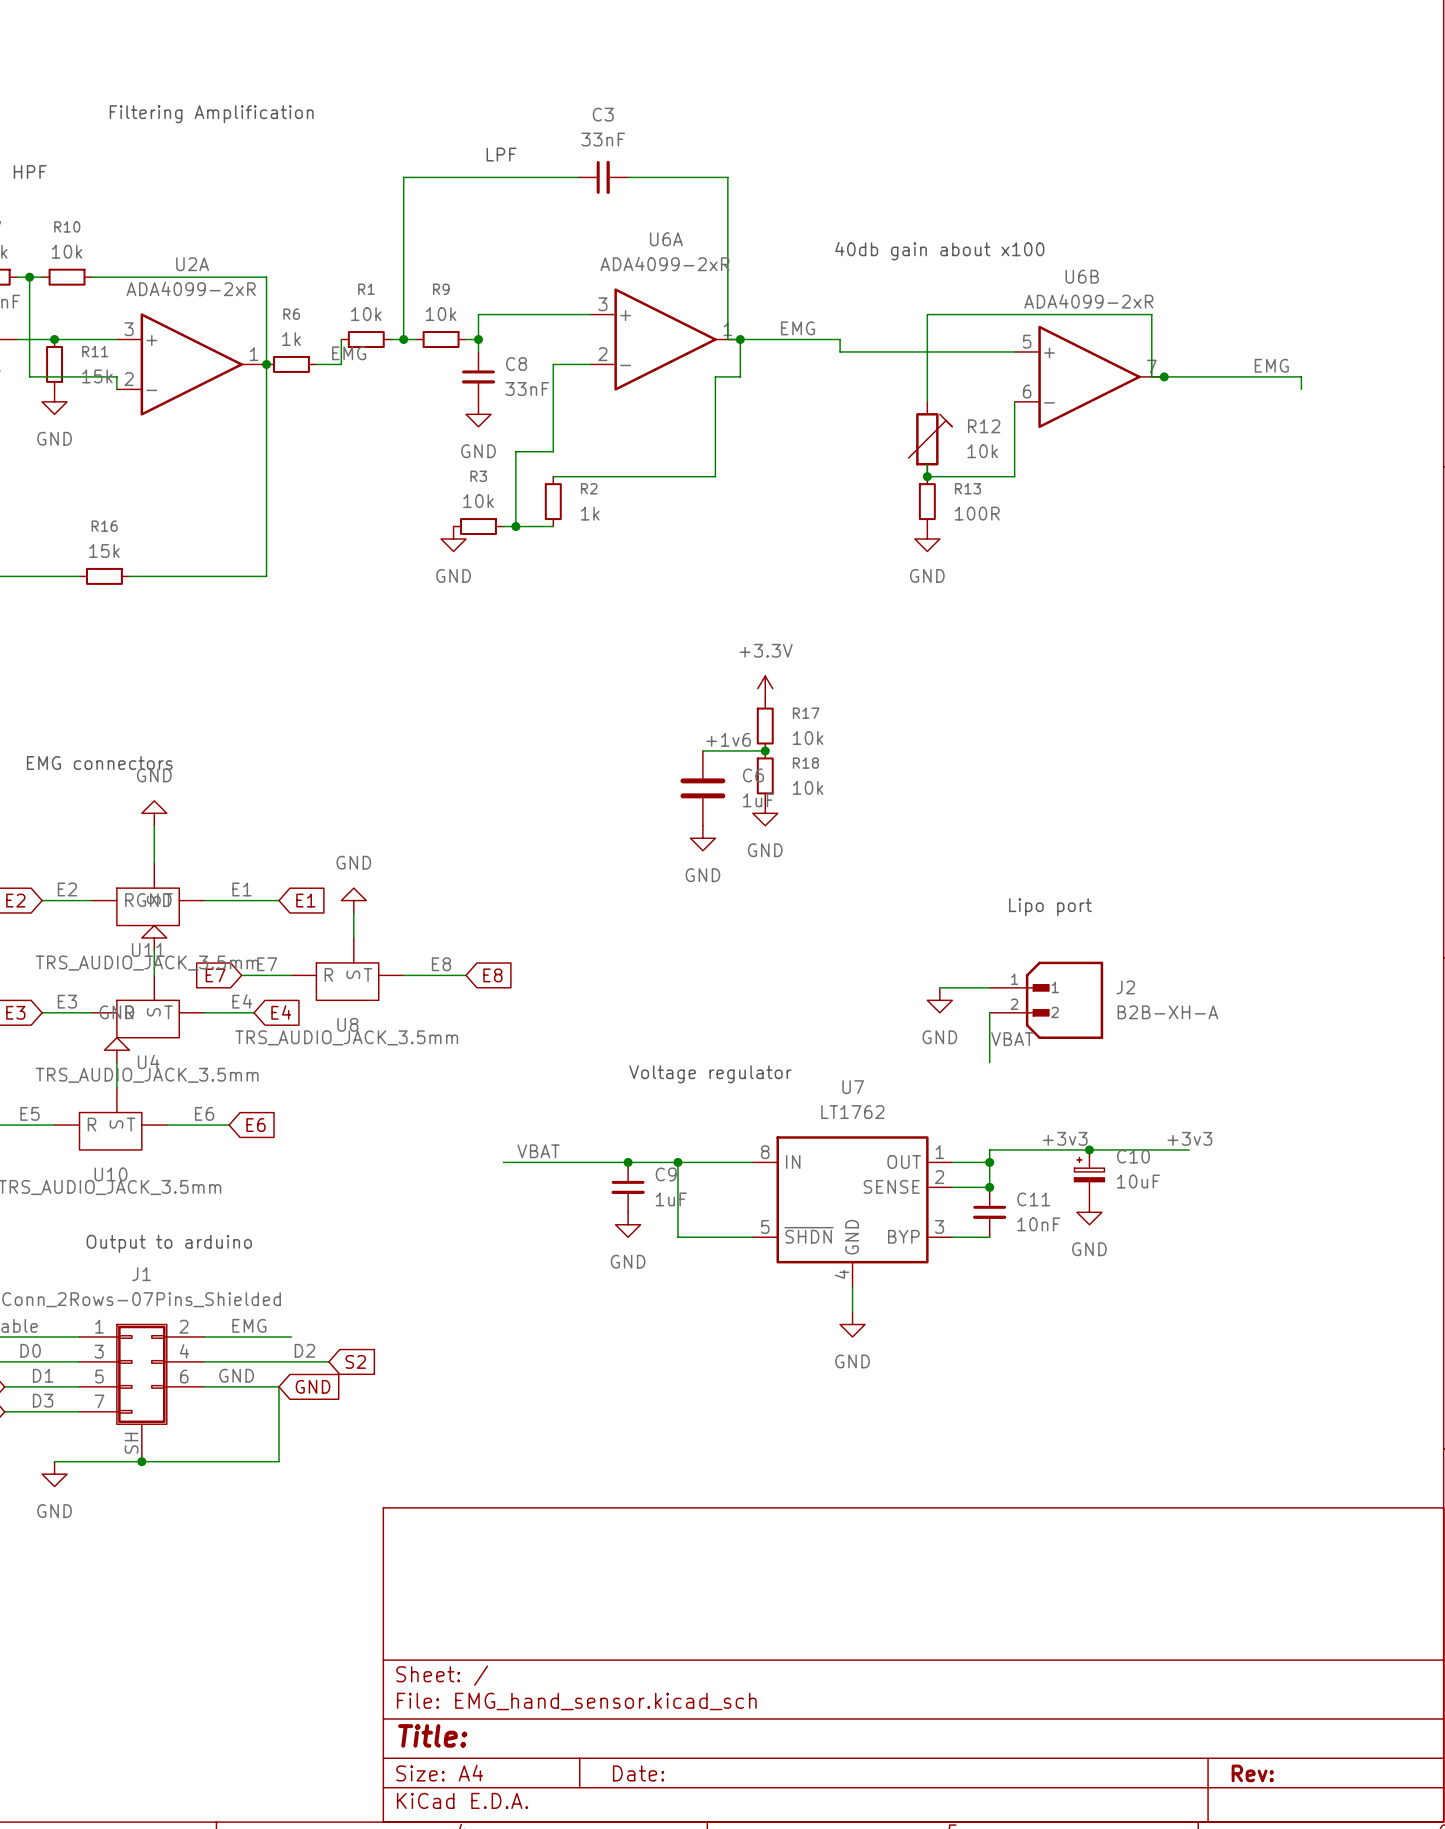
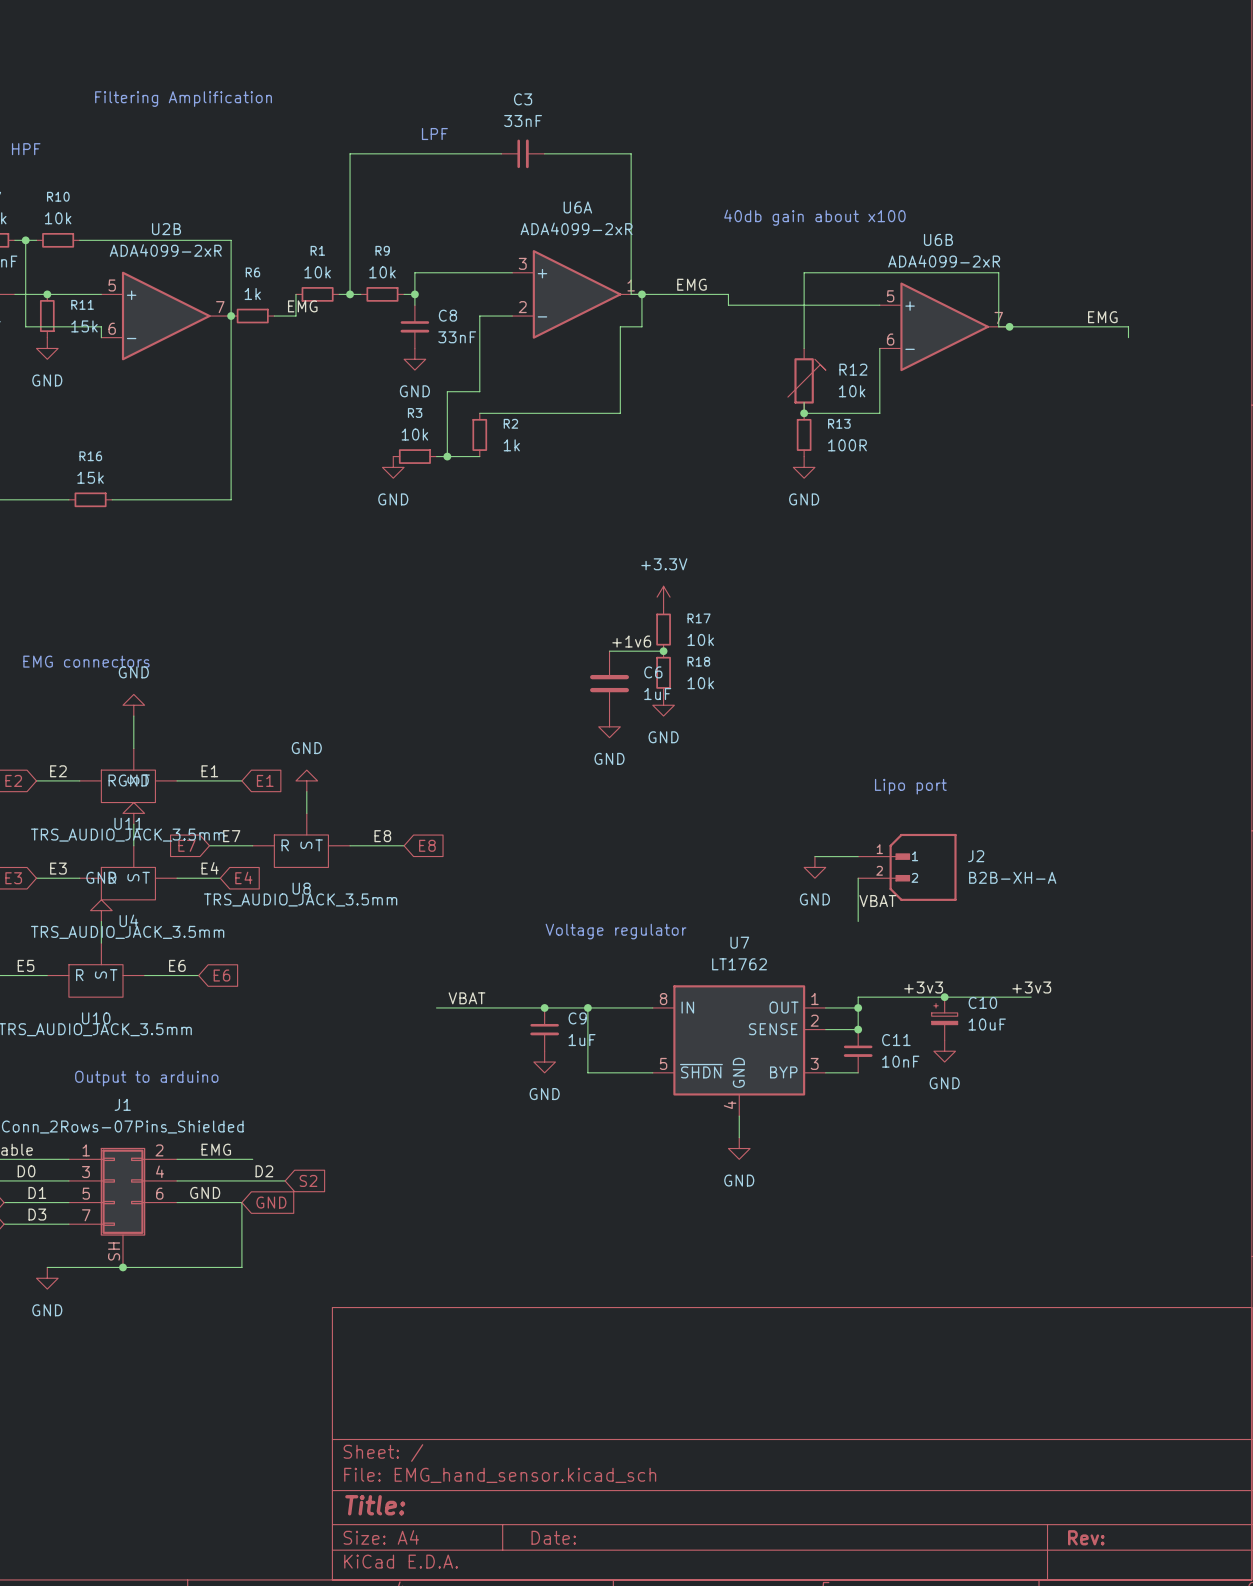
U2A name: U2A (192, 264) -> U2B (166, 229)
U2A pin number: 3 (129, 329) -> 5 (112, 285)
U2A pin number: 1 (254, 354) -> 7 (220, 307)
U2A pin number: 2 (129, 379) -> 6 (112, 328)

